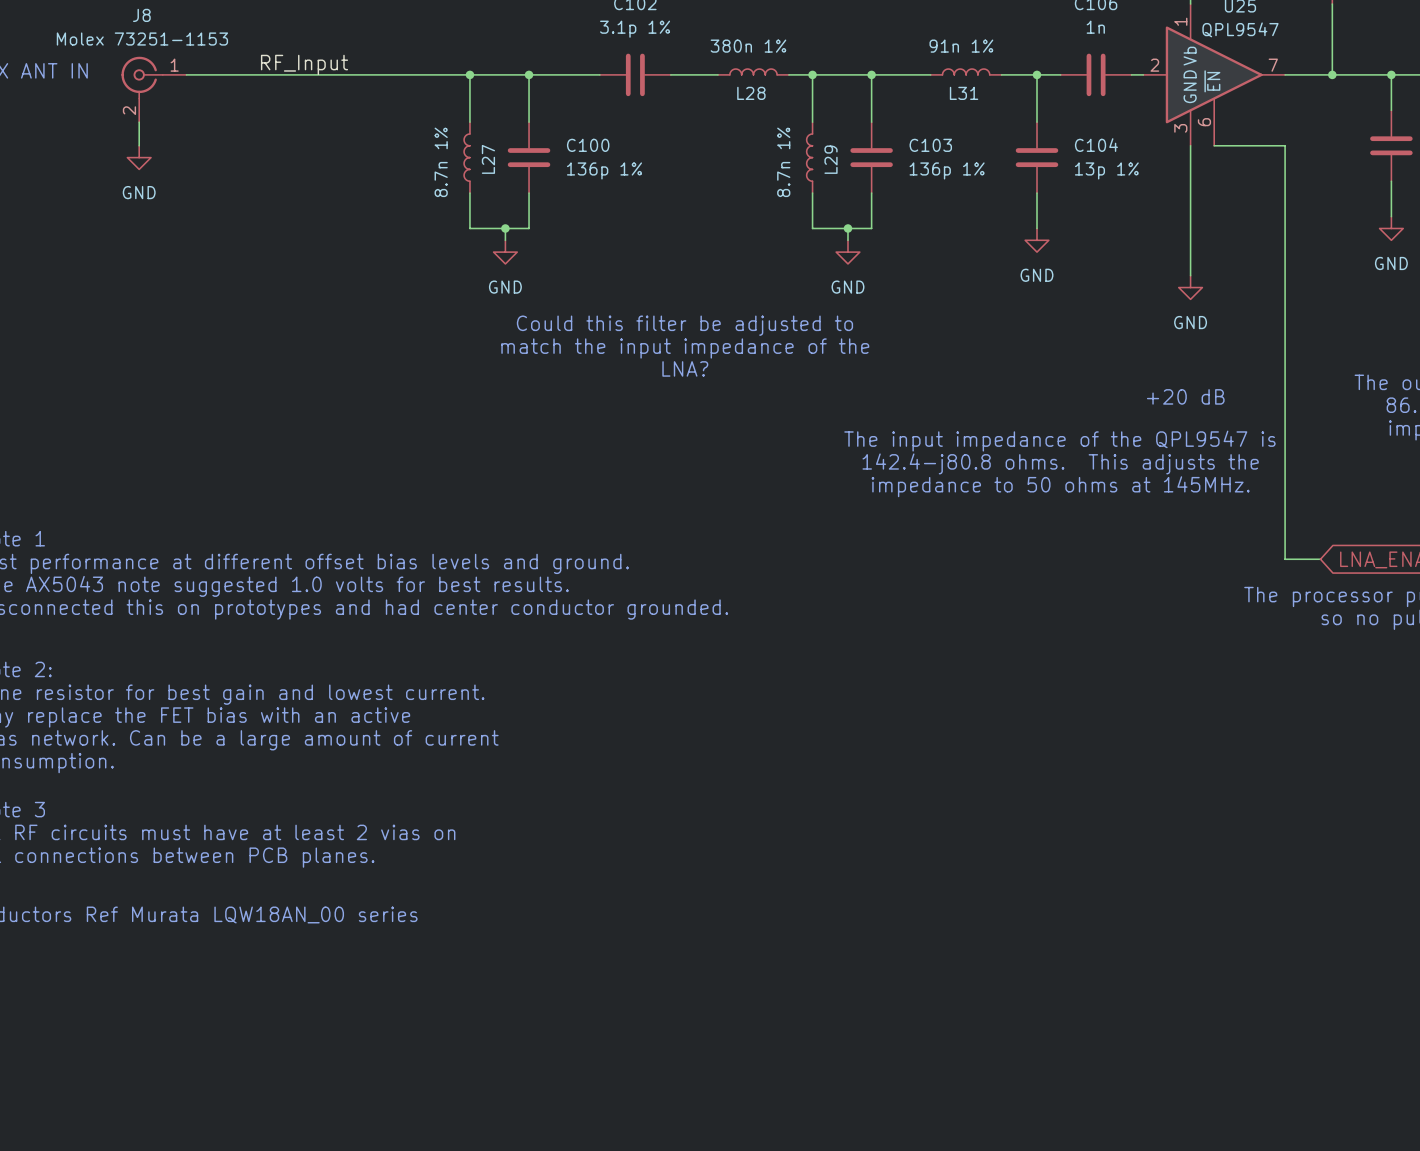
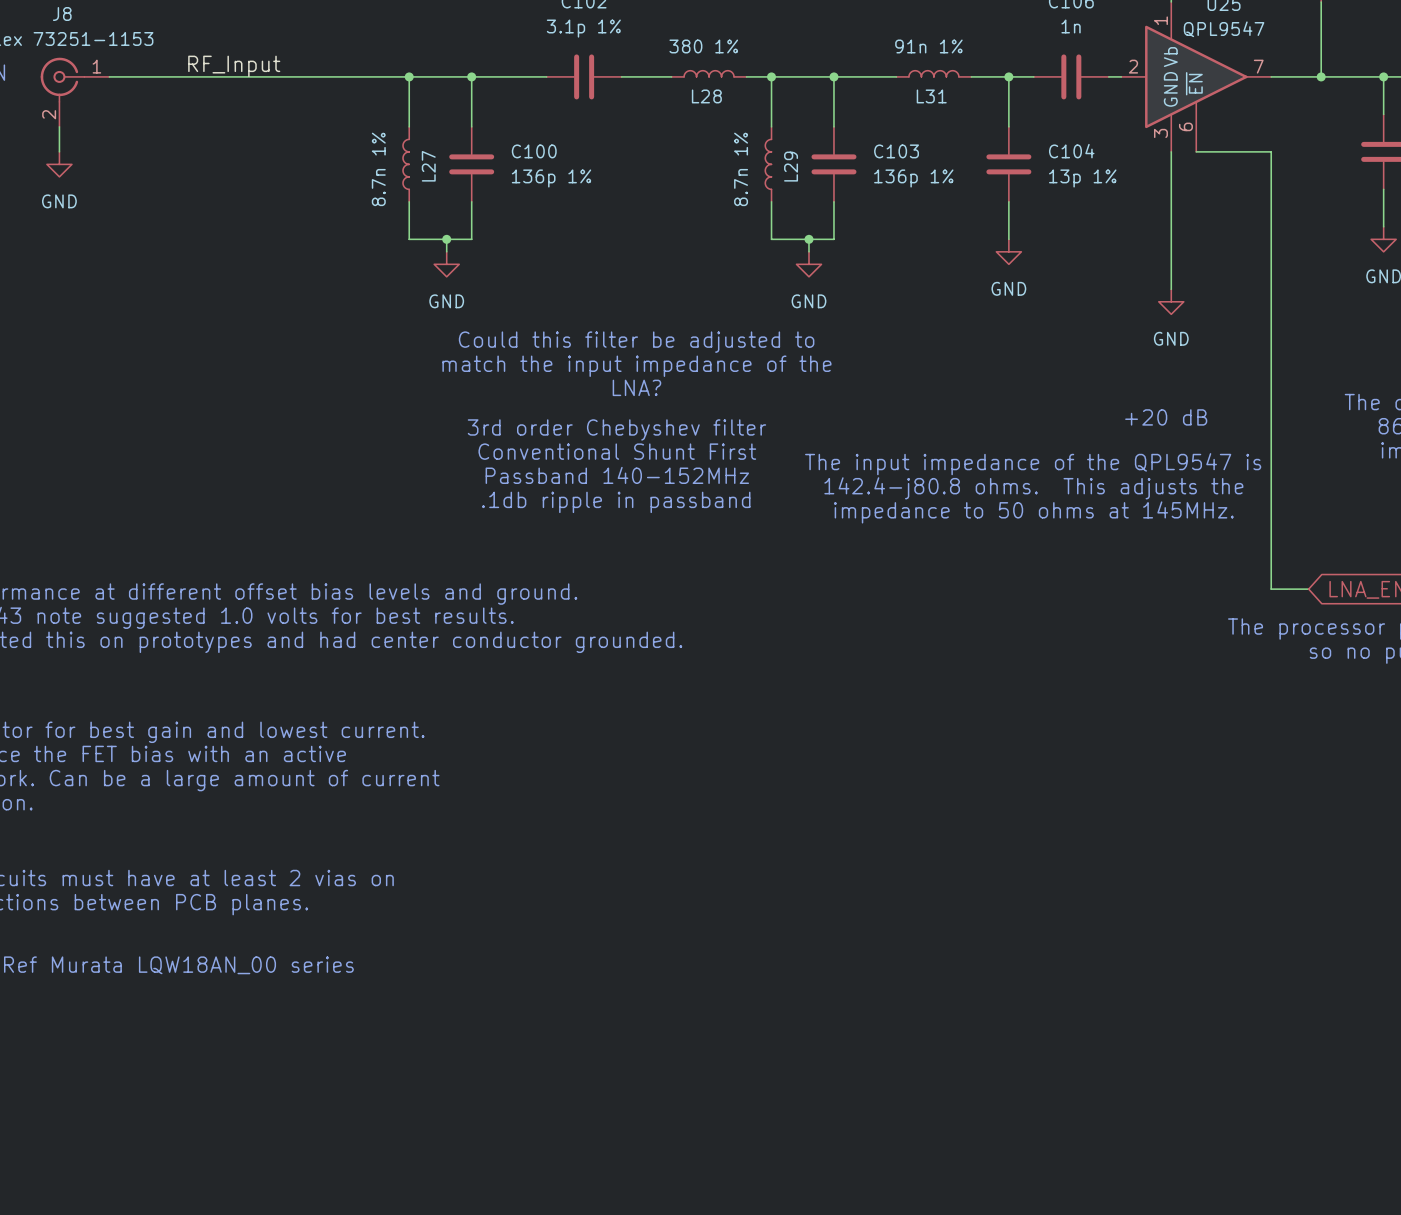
L28 value: 380n 1% (748, 46) -> 380 1% (703, 46)
text: none -> 3rd order Chebyshev filter (616, 429)
text: none -> Conventional Shunt First (617, 451)
text: none -> Passband 140-152MHz (617, 475)
text: none -> .1db ripple in passband (616, 502)

